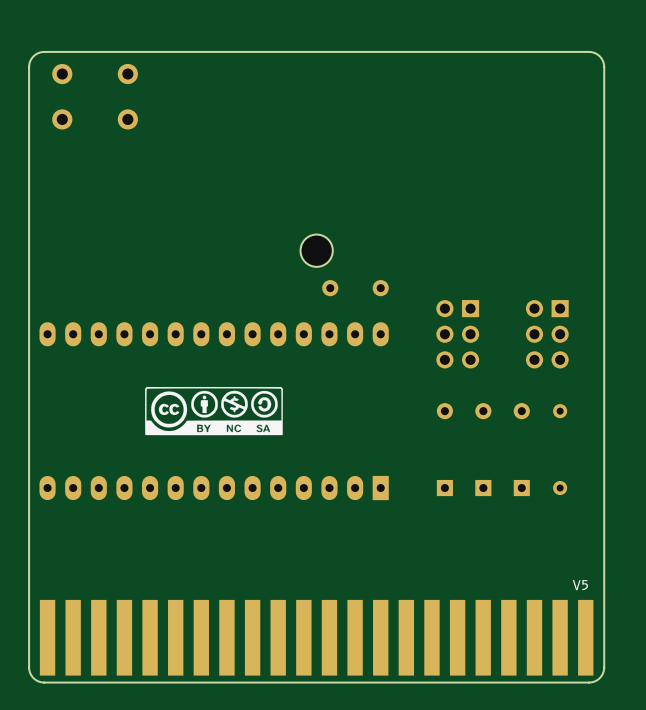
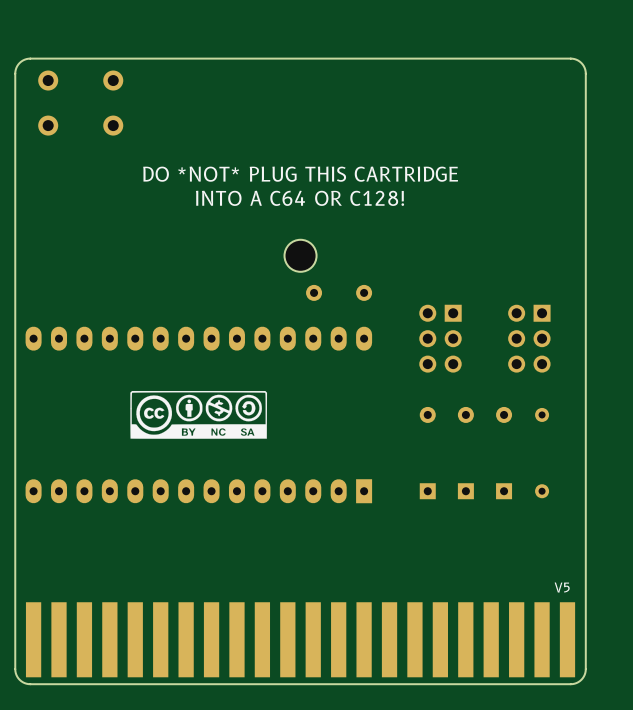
text: none -> DO *NOT* PLUG THIS CARTRIDGE (300, 174)
text: none -> INTO A C64 OR C128! (300, 198)

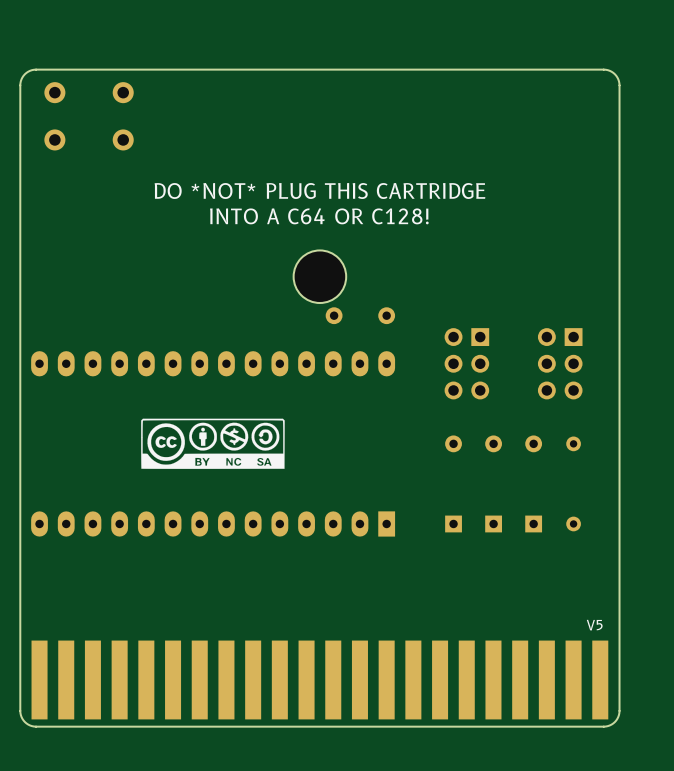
part footprint: [284, 239, 317, 272] -> [293, 250, 347, 304]

